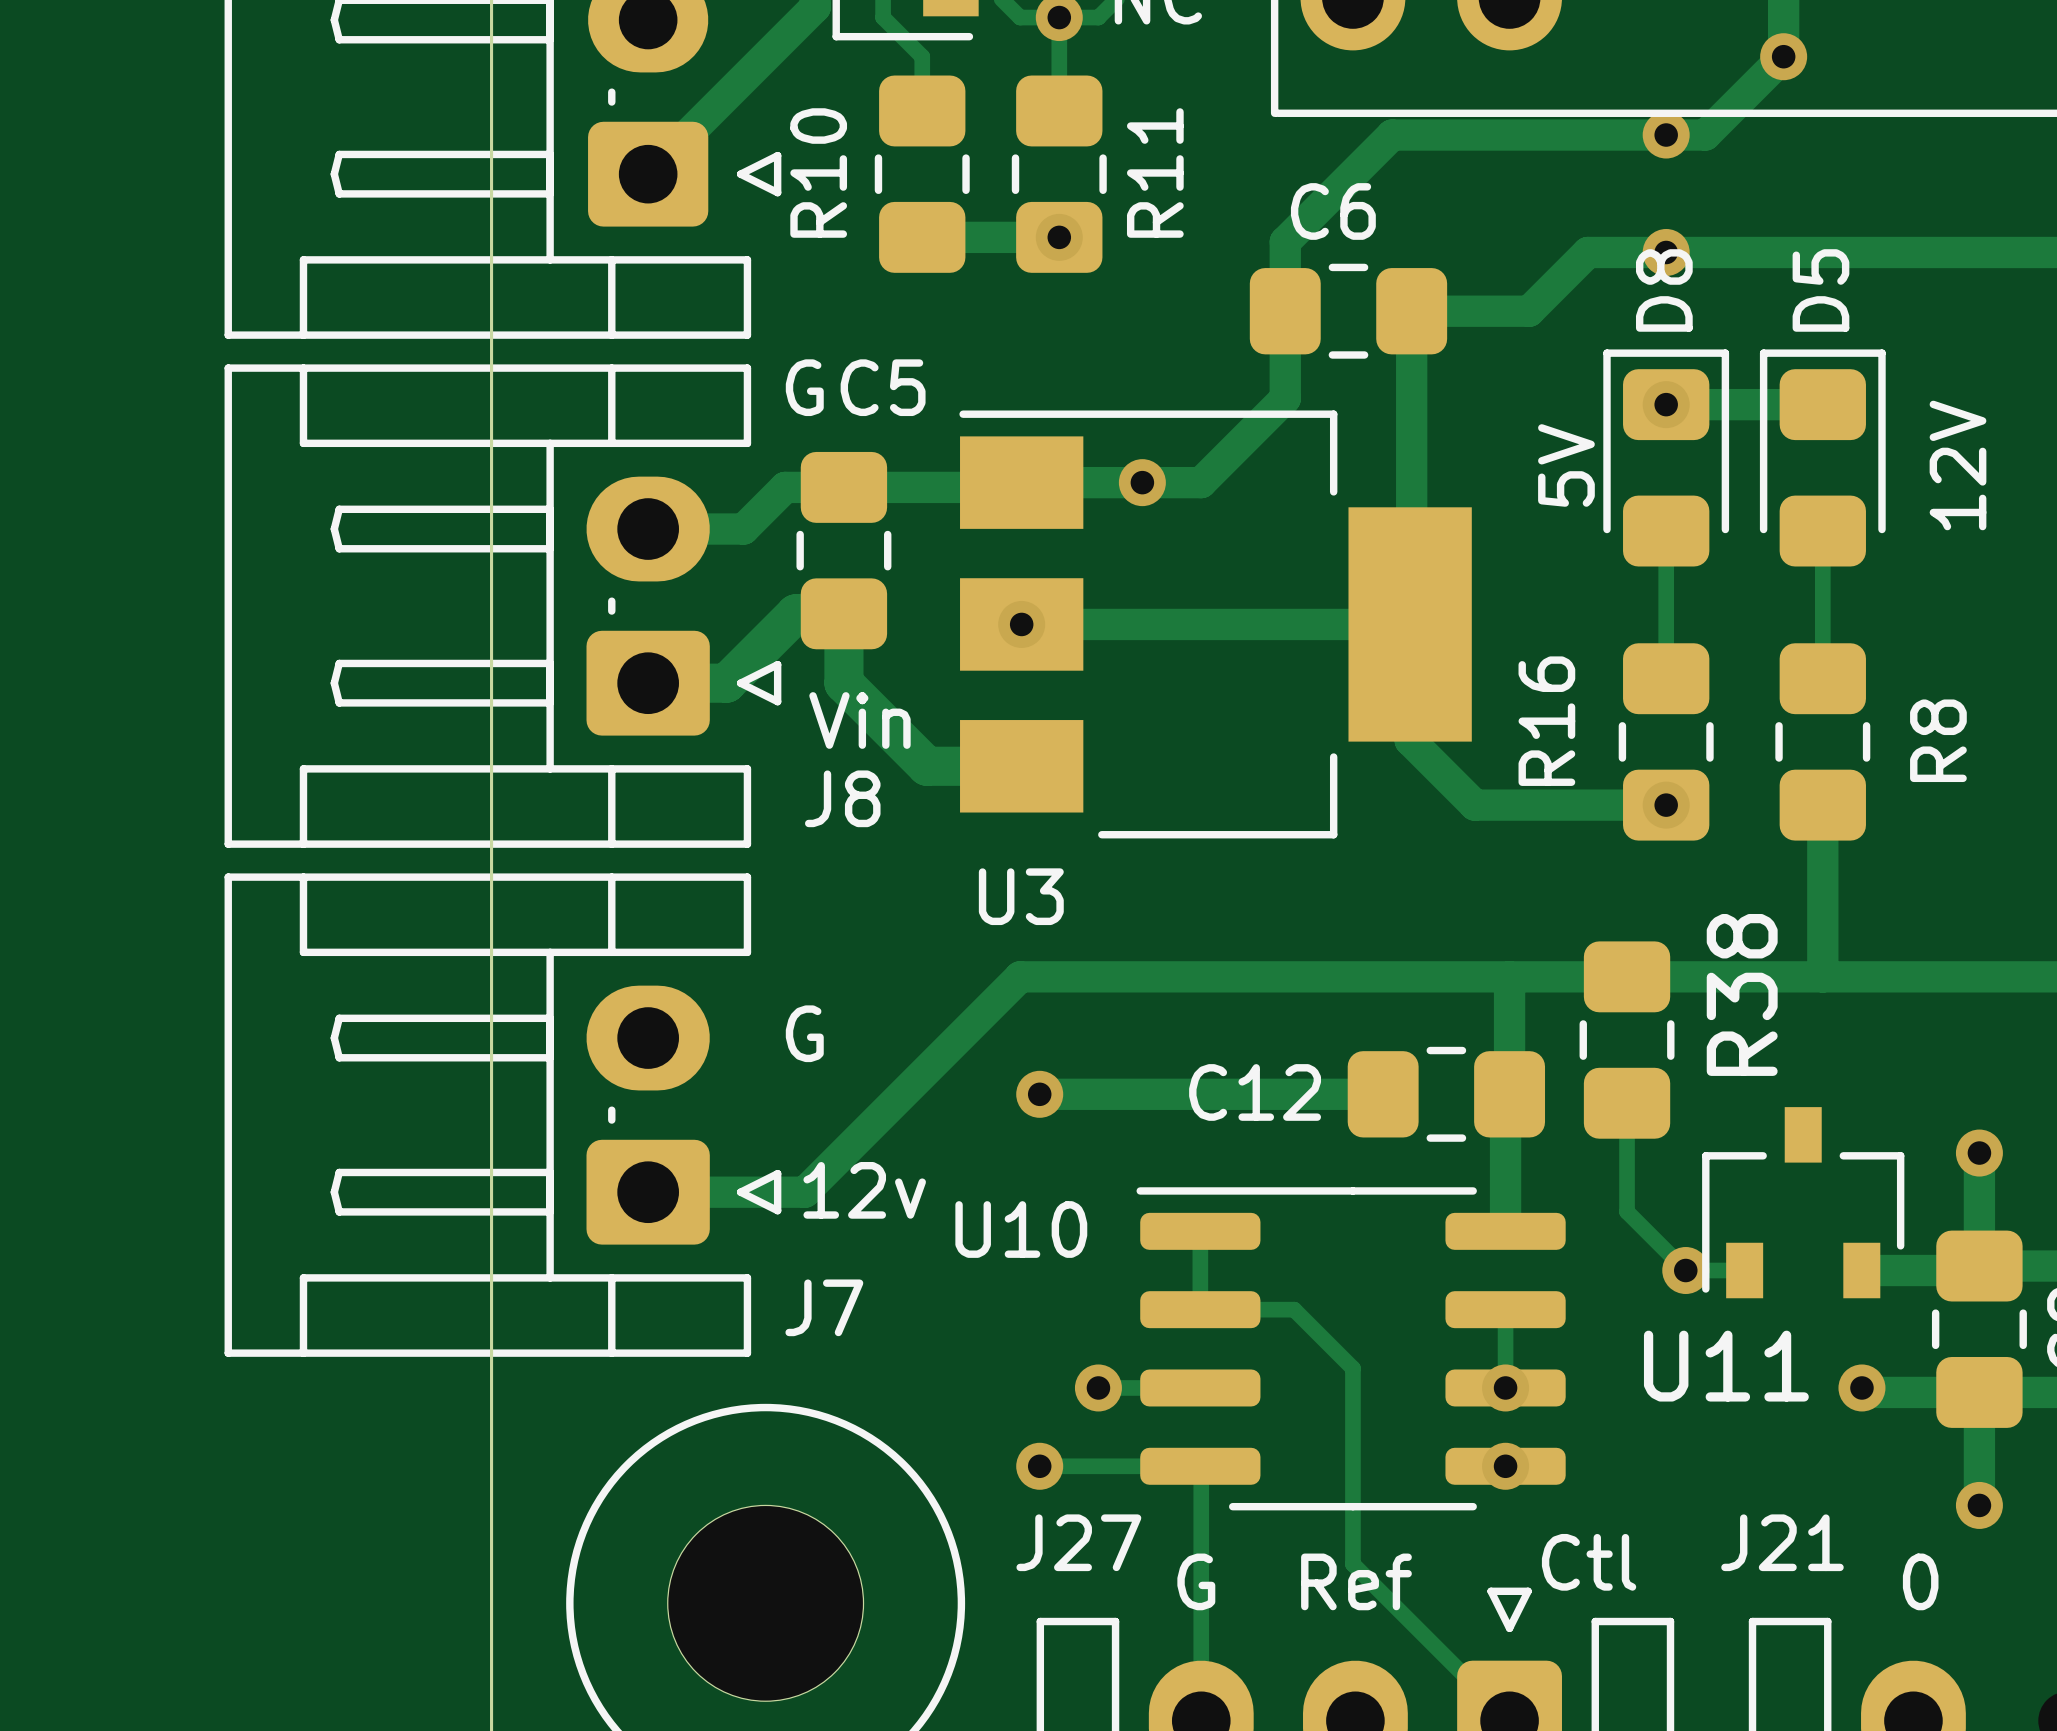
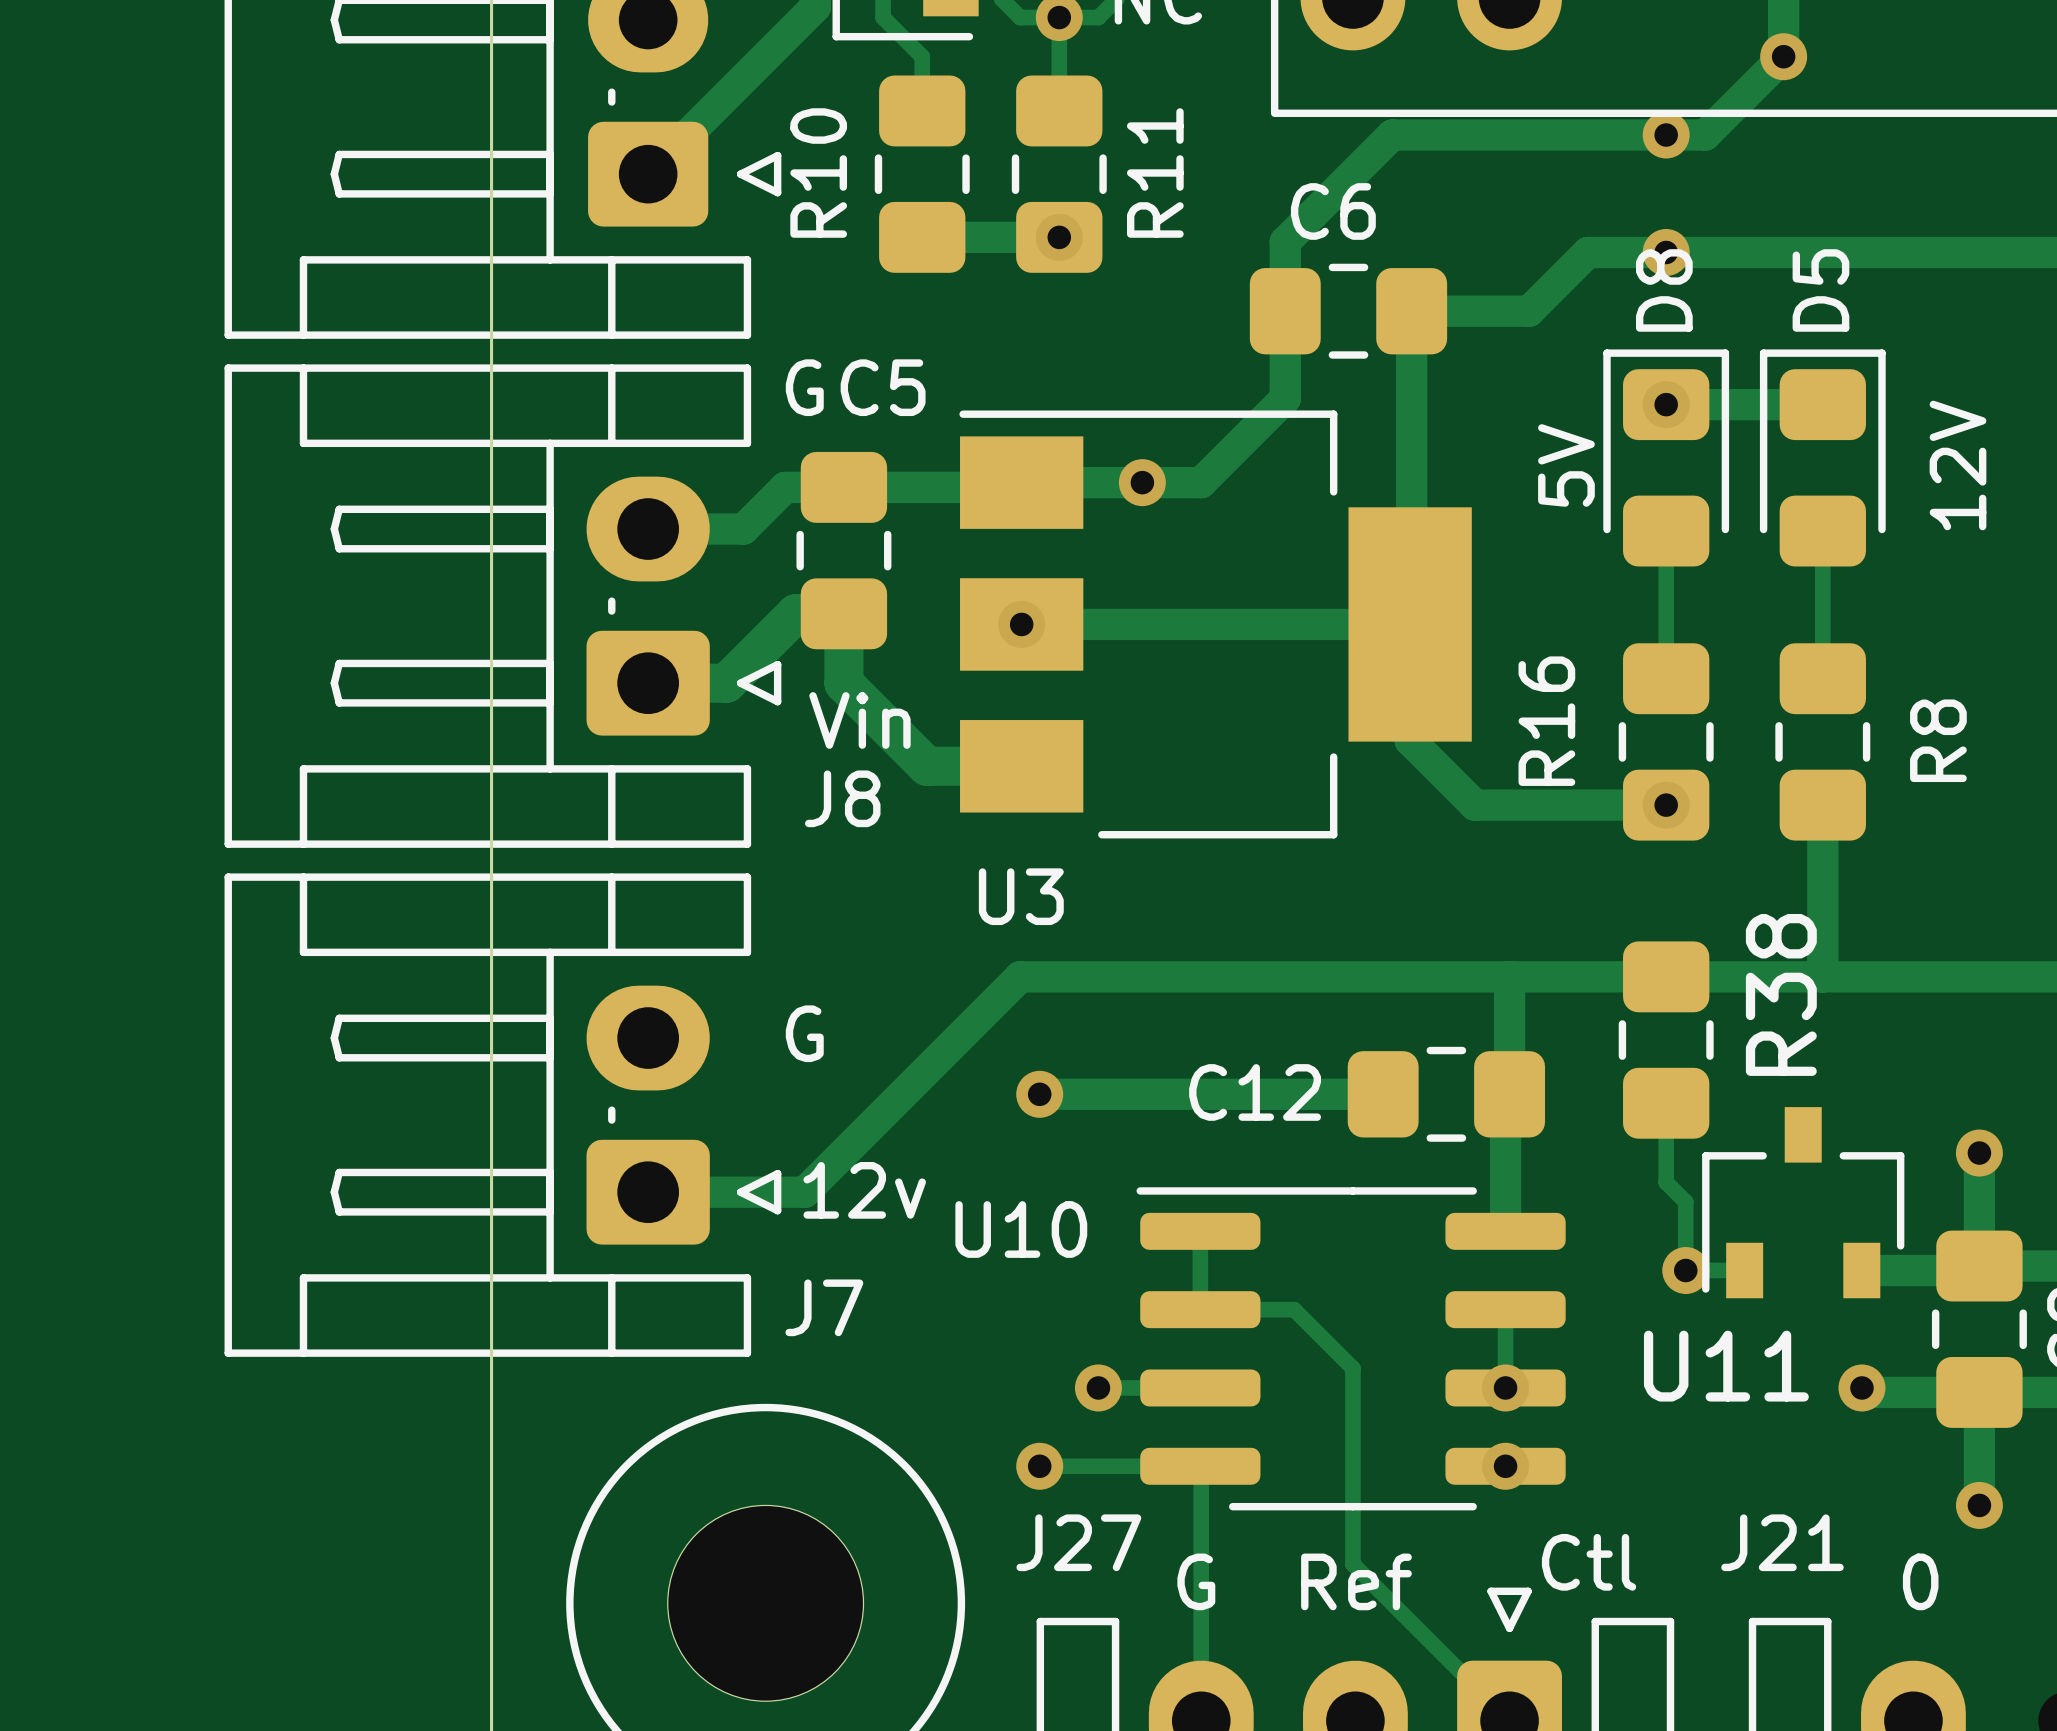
R38 position: (1627, 1040) -> (1666, 1040)
track: (1627, 1103) (1627, 1211) (1685, 1270) -> (1666, 1103) (1666, 1182) (1685, 1201) (1685, 1270)

